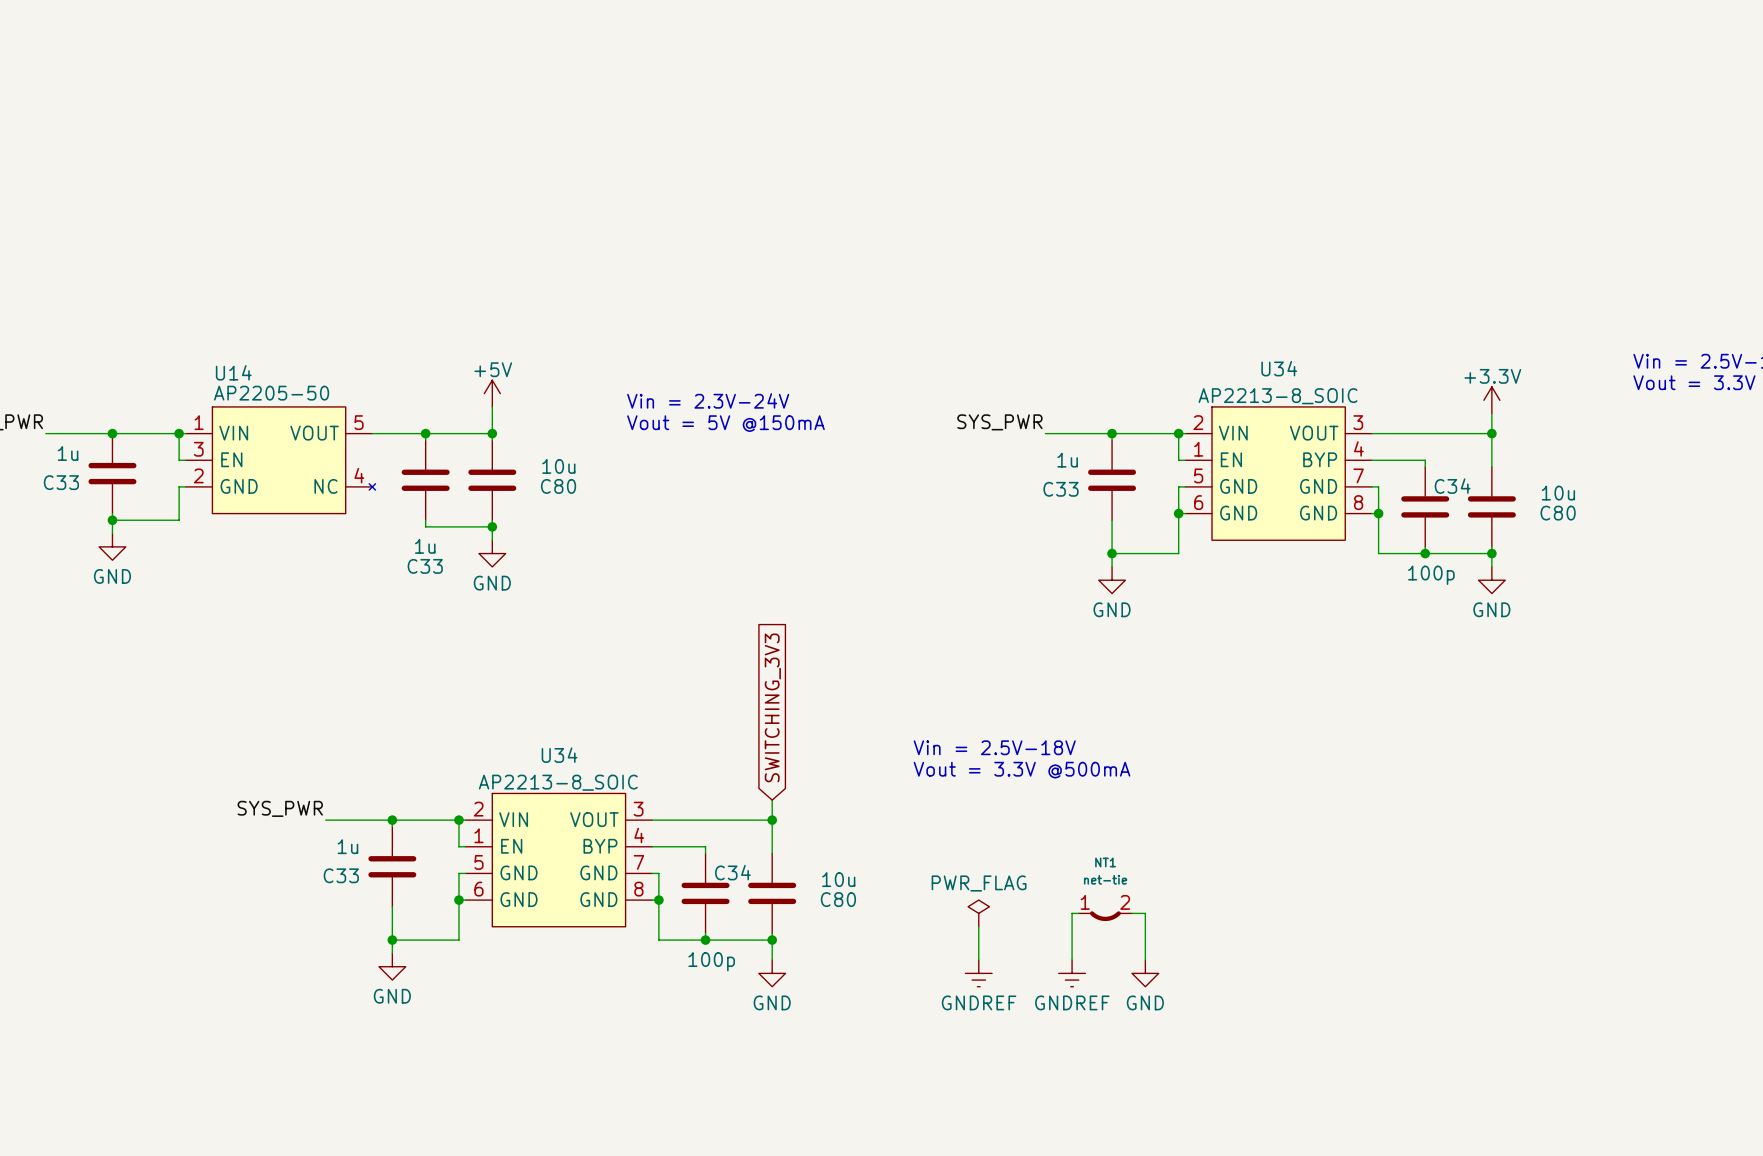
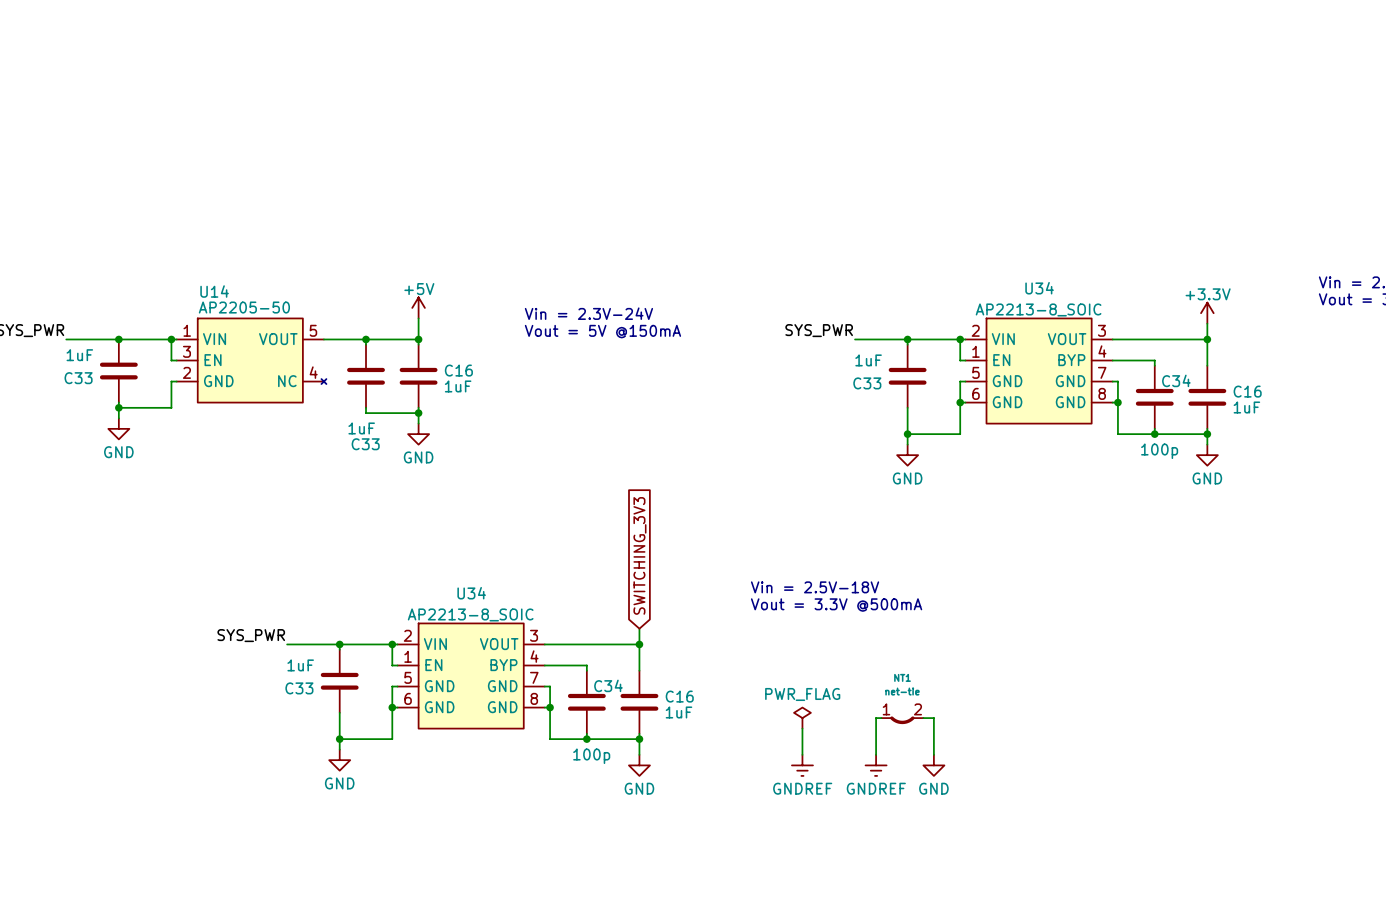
C33 value: 1u (68, 453) -> 1uF (79, 355)
C33 value: 1u (1067, 460) -> 1uF (868, 360)
C80 value: 10u (558, 466) -> 1uF (458, 386)
C80 name: C80 (558, 486) -> C16 (458, 370)
C80 value: 10u (1558, 493) -> 1uF (1246, 407)
C80 name: C80 (1558, 513) -> C16 (1247, 391)
C33 value: 1u (425, 546) -> 1uF (361, 428)
C33 value: 1u (347, 846) -> 1uF (300, 665)
C80 value: 10u (838, 879) -> 1uF (678, 712)
C80 name: C80 (838, 899) -> C16 (679, 696)

